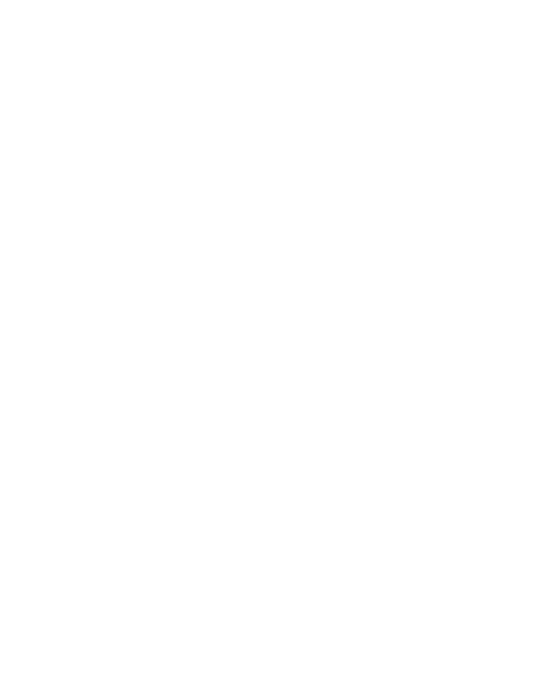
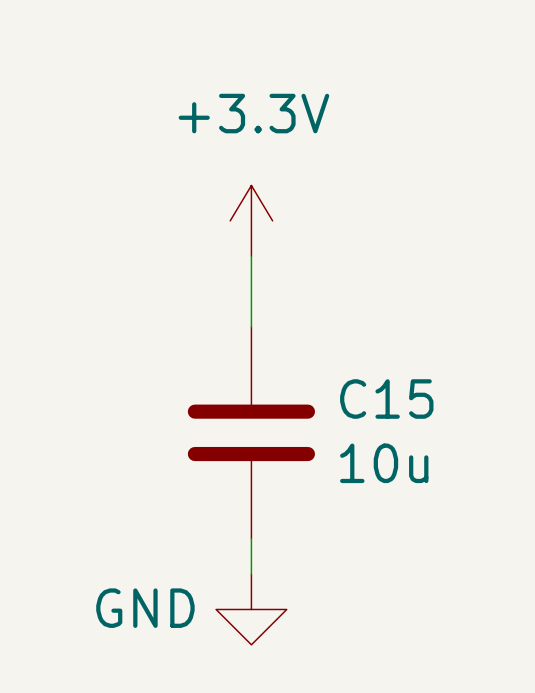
power symbol: none -> +3.3V (251, 220)
wire: none -> (251, 256) (251, 326)
C15: none -> 10u (251, 432)
wire: none -> (251, 538) (251, 574)
power symbol: none -> GND (251, 609)

